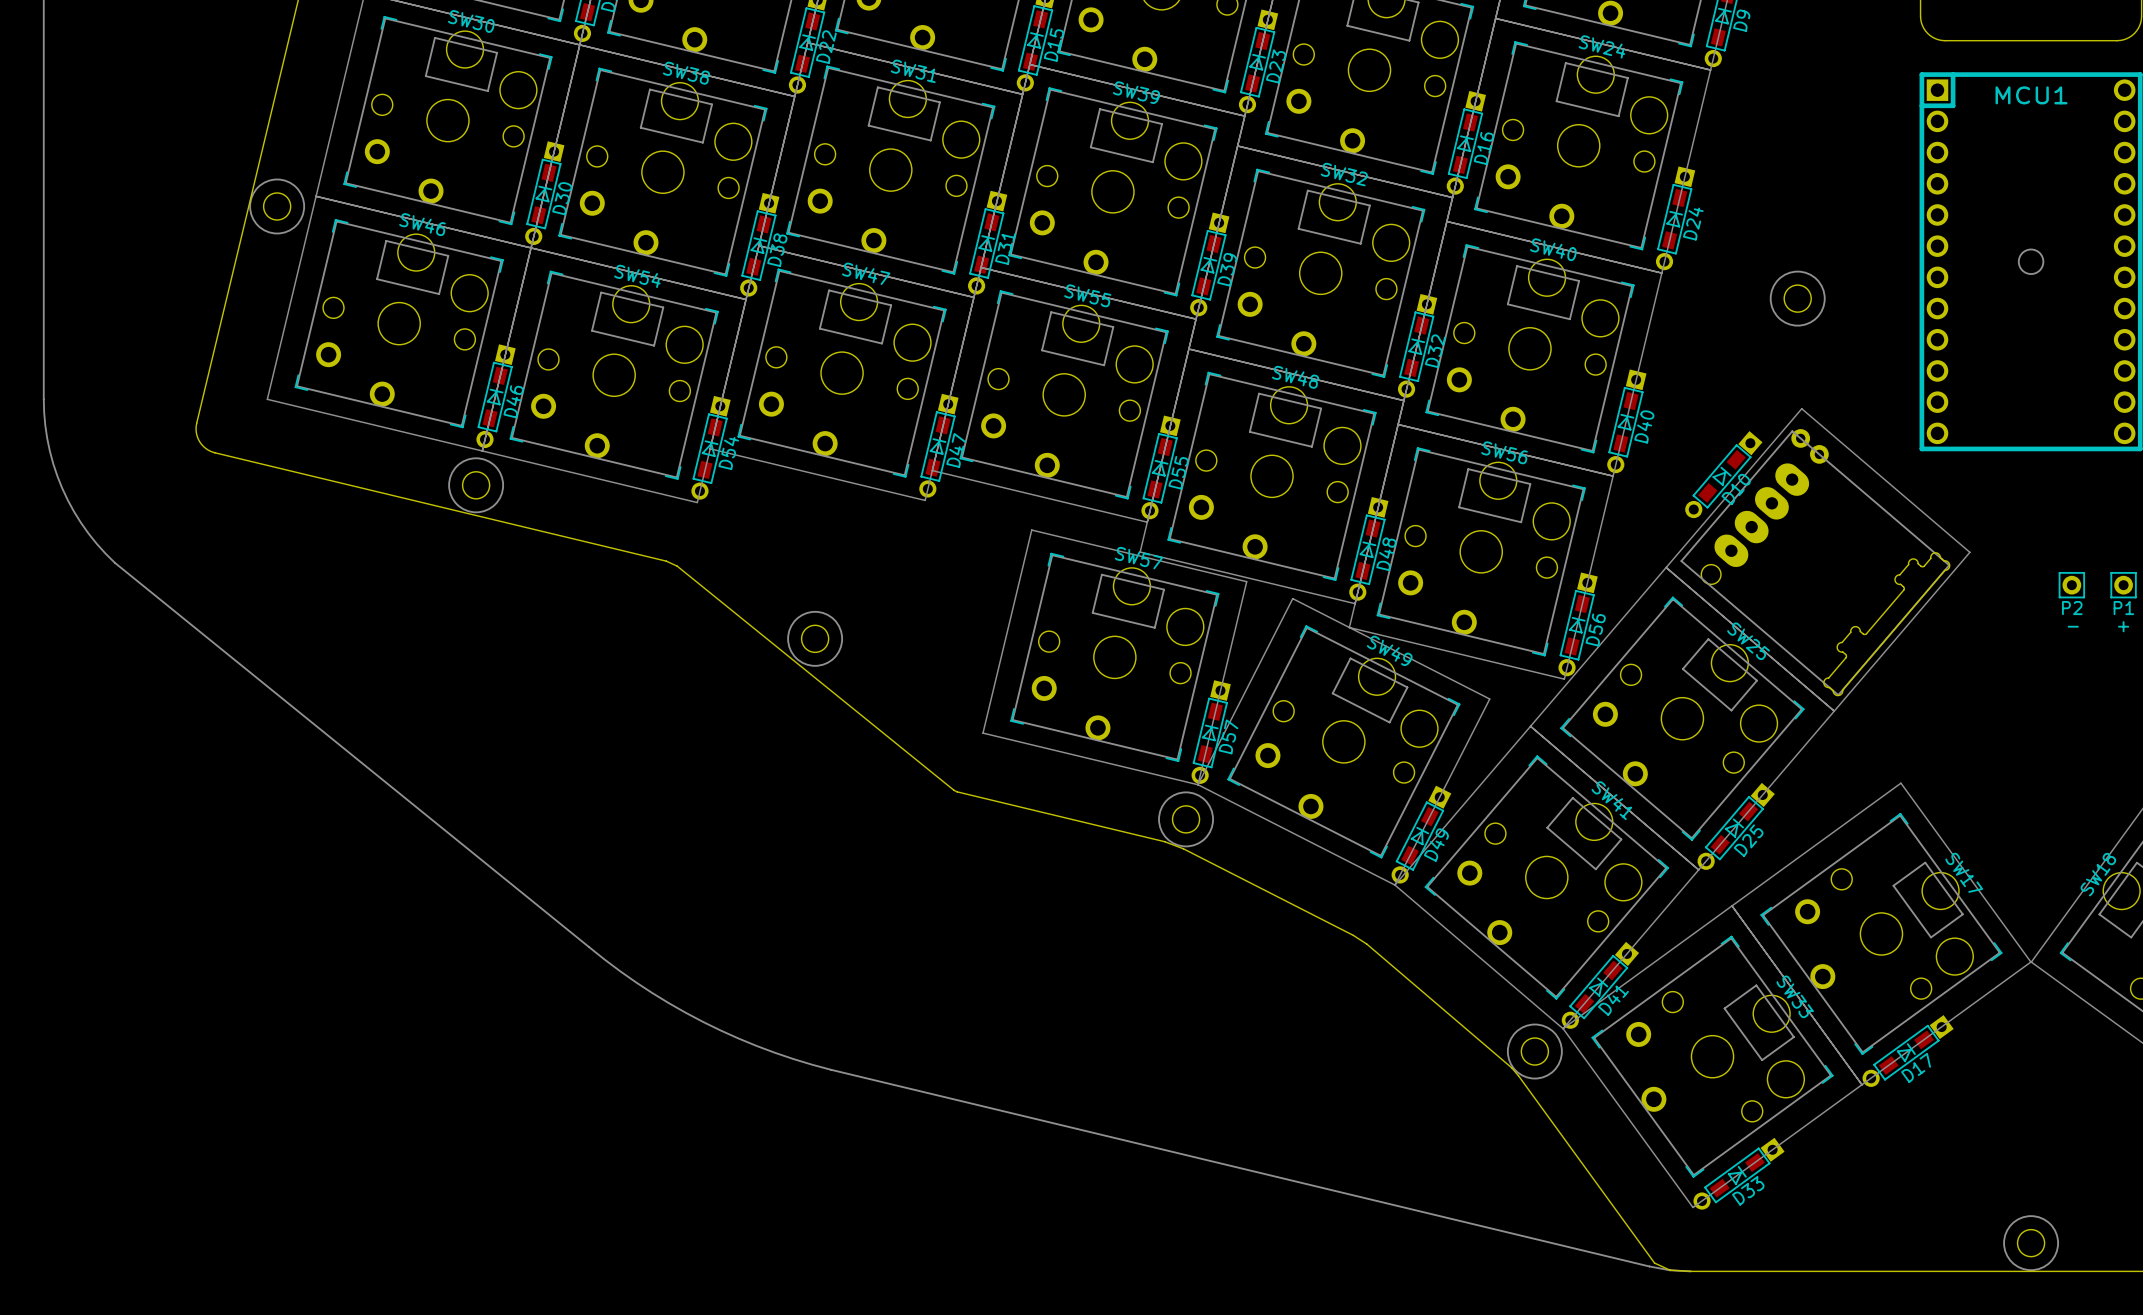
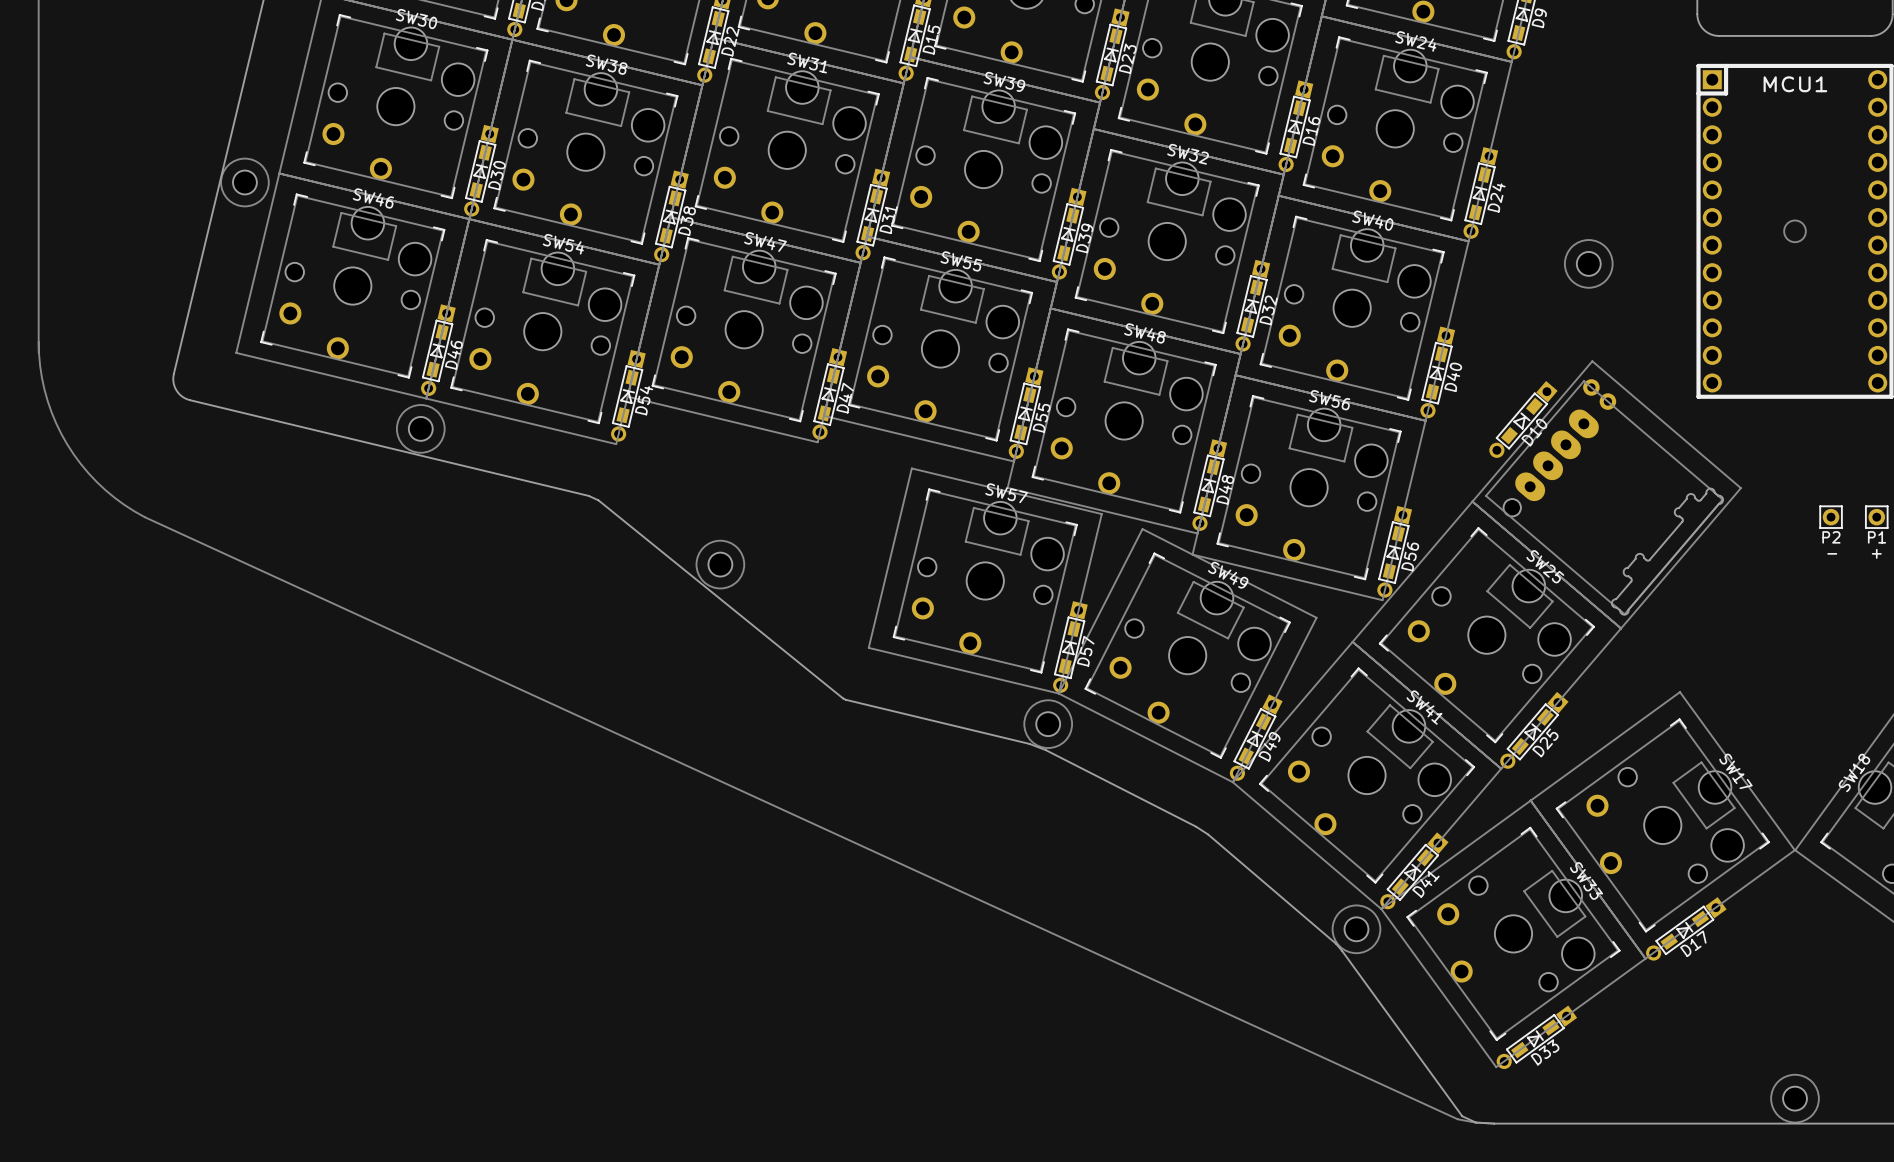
line: (43, 399) (45, 425) (49, 451) (62, 488) (81, 522) (96, 543) (114, 562) (604, 959) (635, 982) (685, 1012) (756, 1045) (831, 1069) (1649, 1266) -> (38, 342) (41, 377) (47, 400) (67, 444) (96, 482) (114, 497) (144, 517) (1457, 1119)

